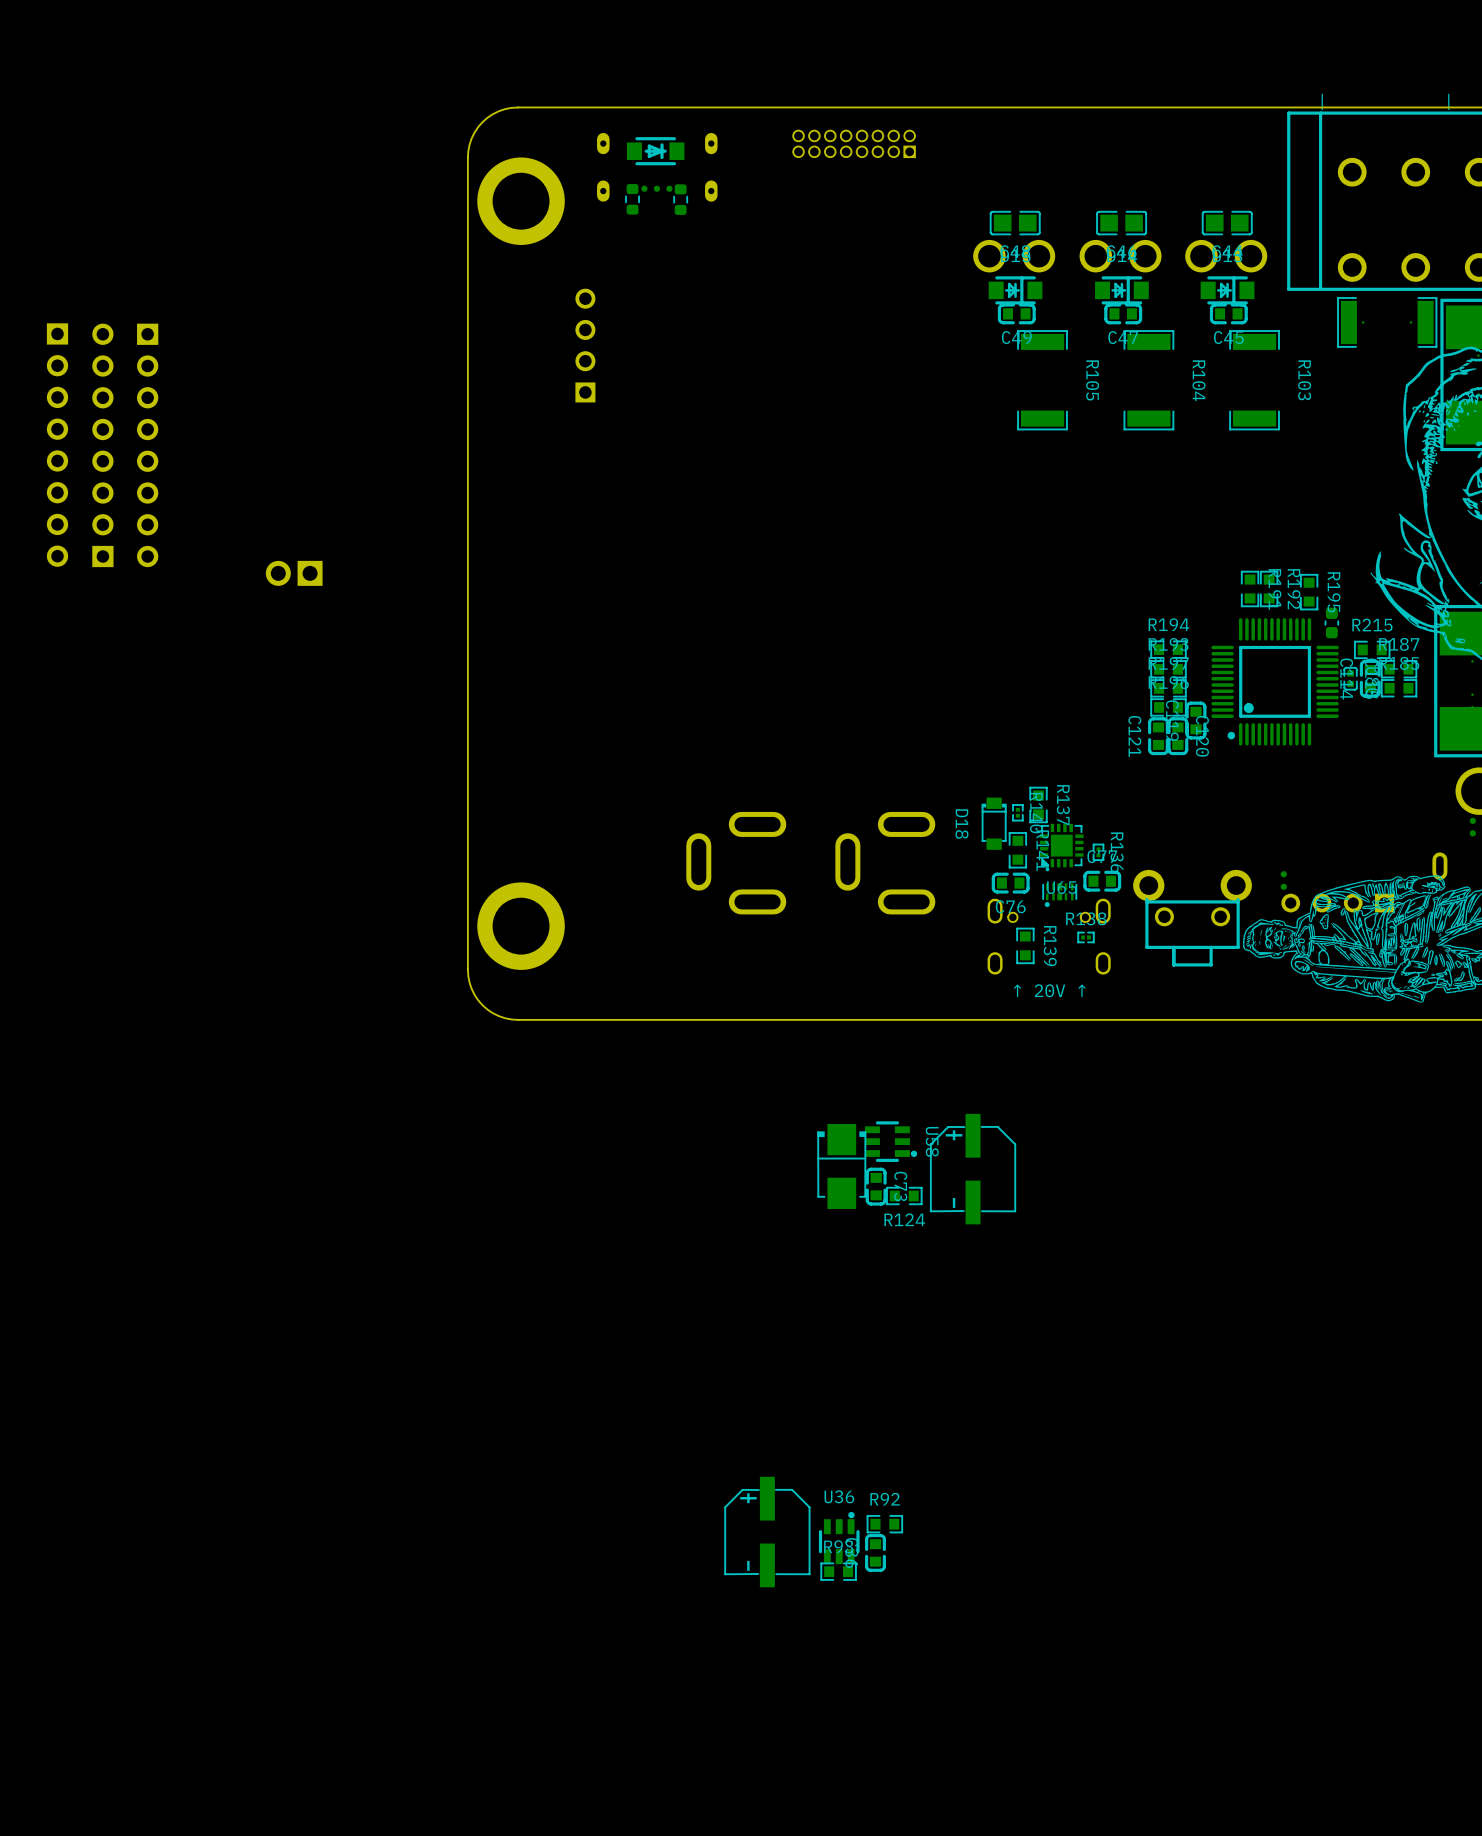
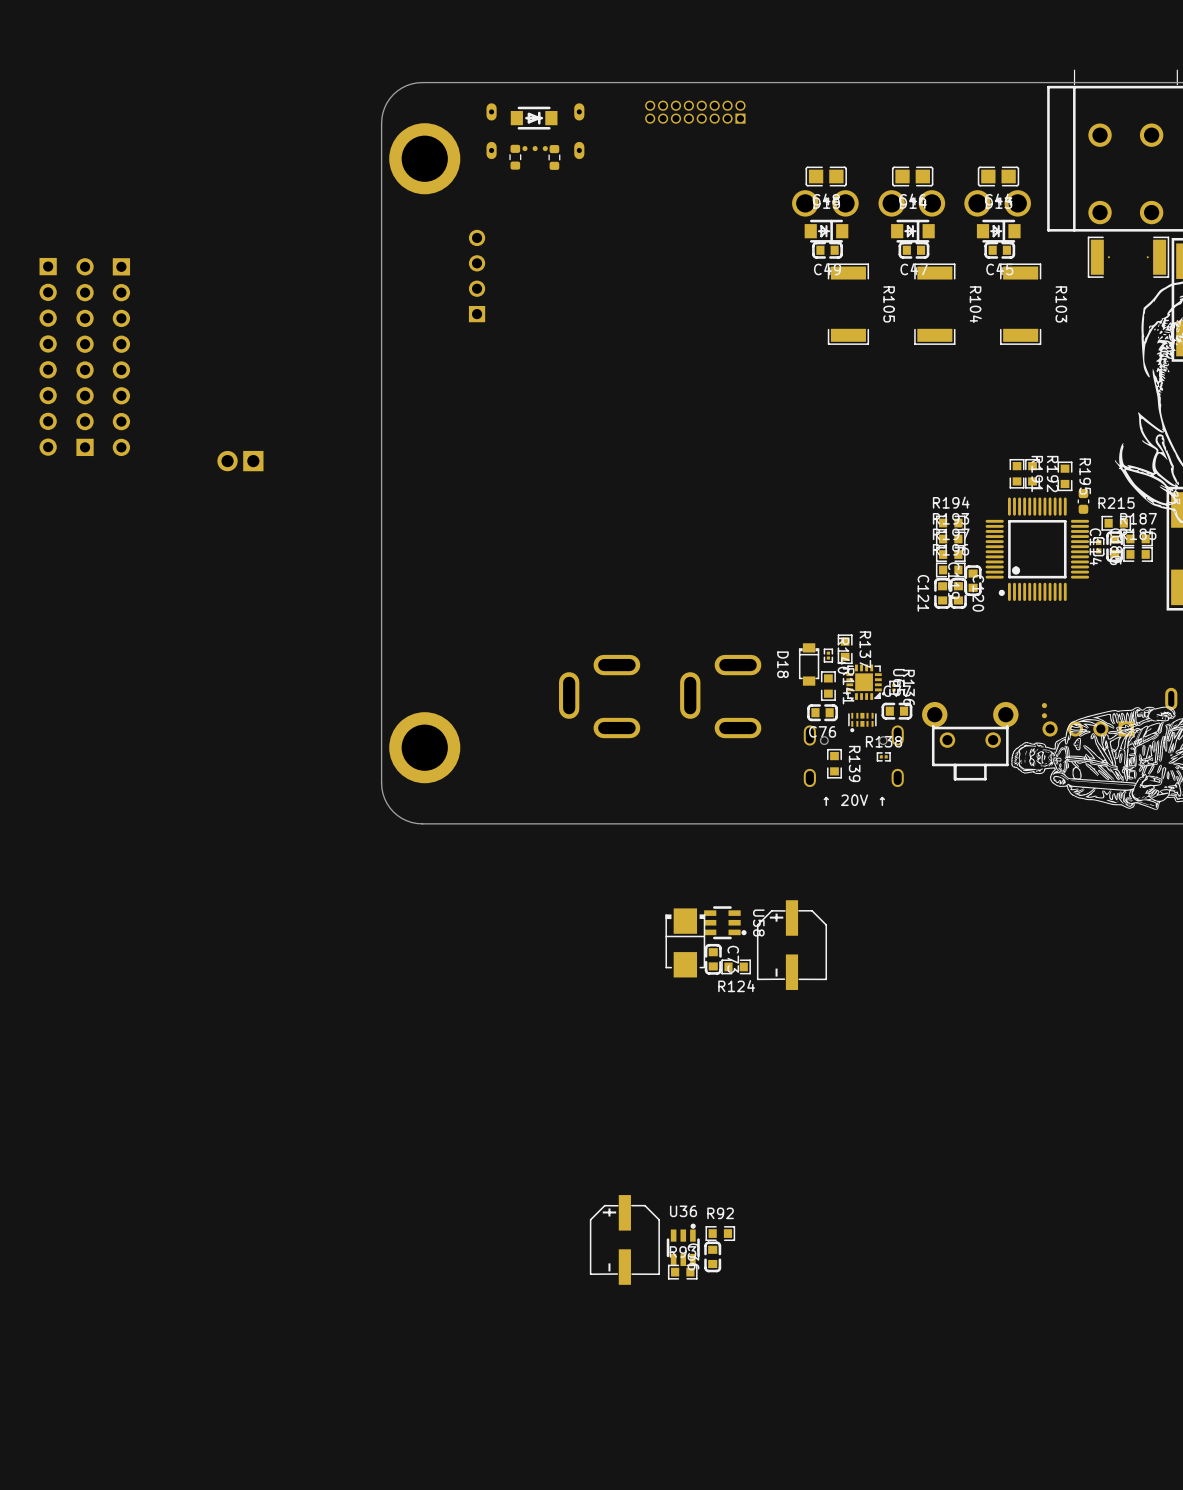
U65 rotation: 0° (1061, 847) -> 90° counterclockwise (865, 682)

